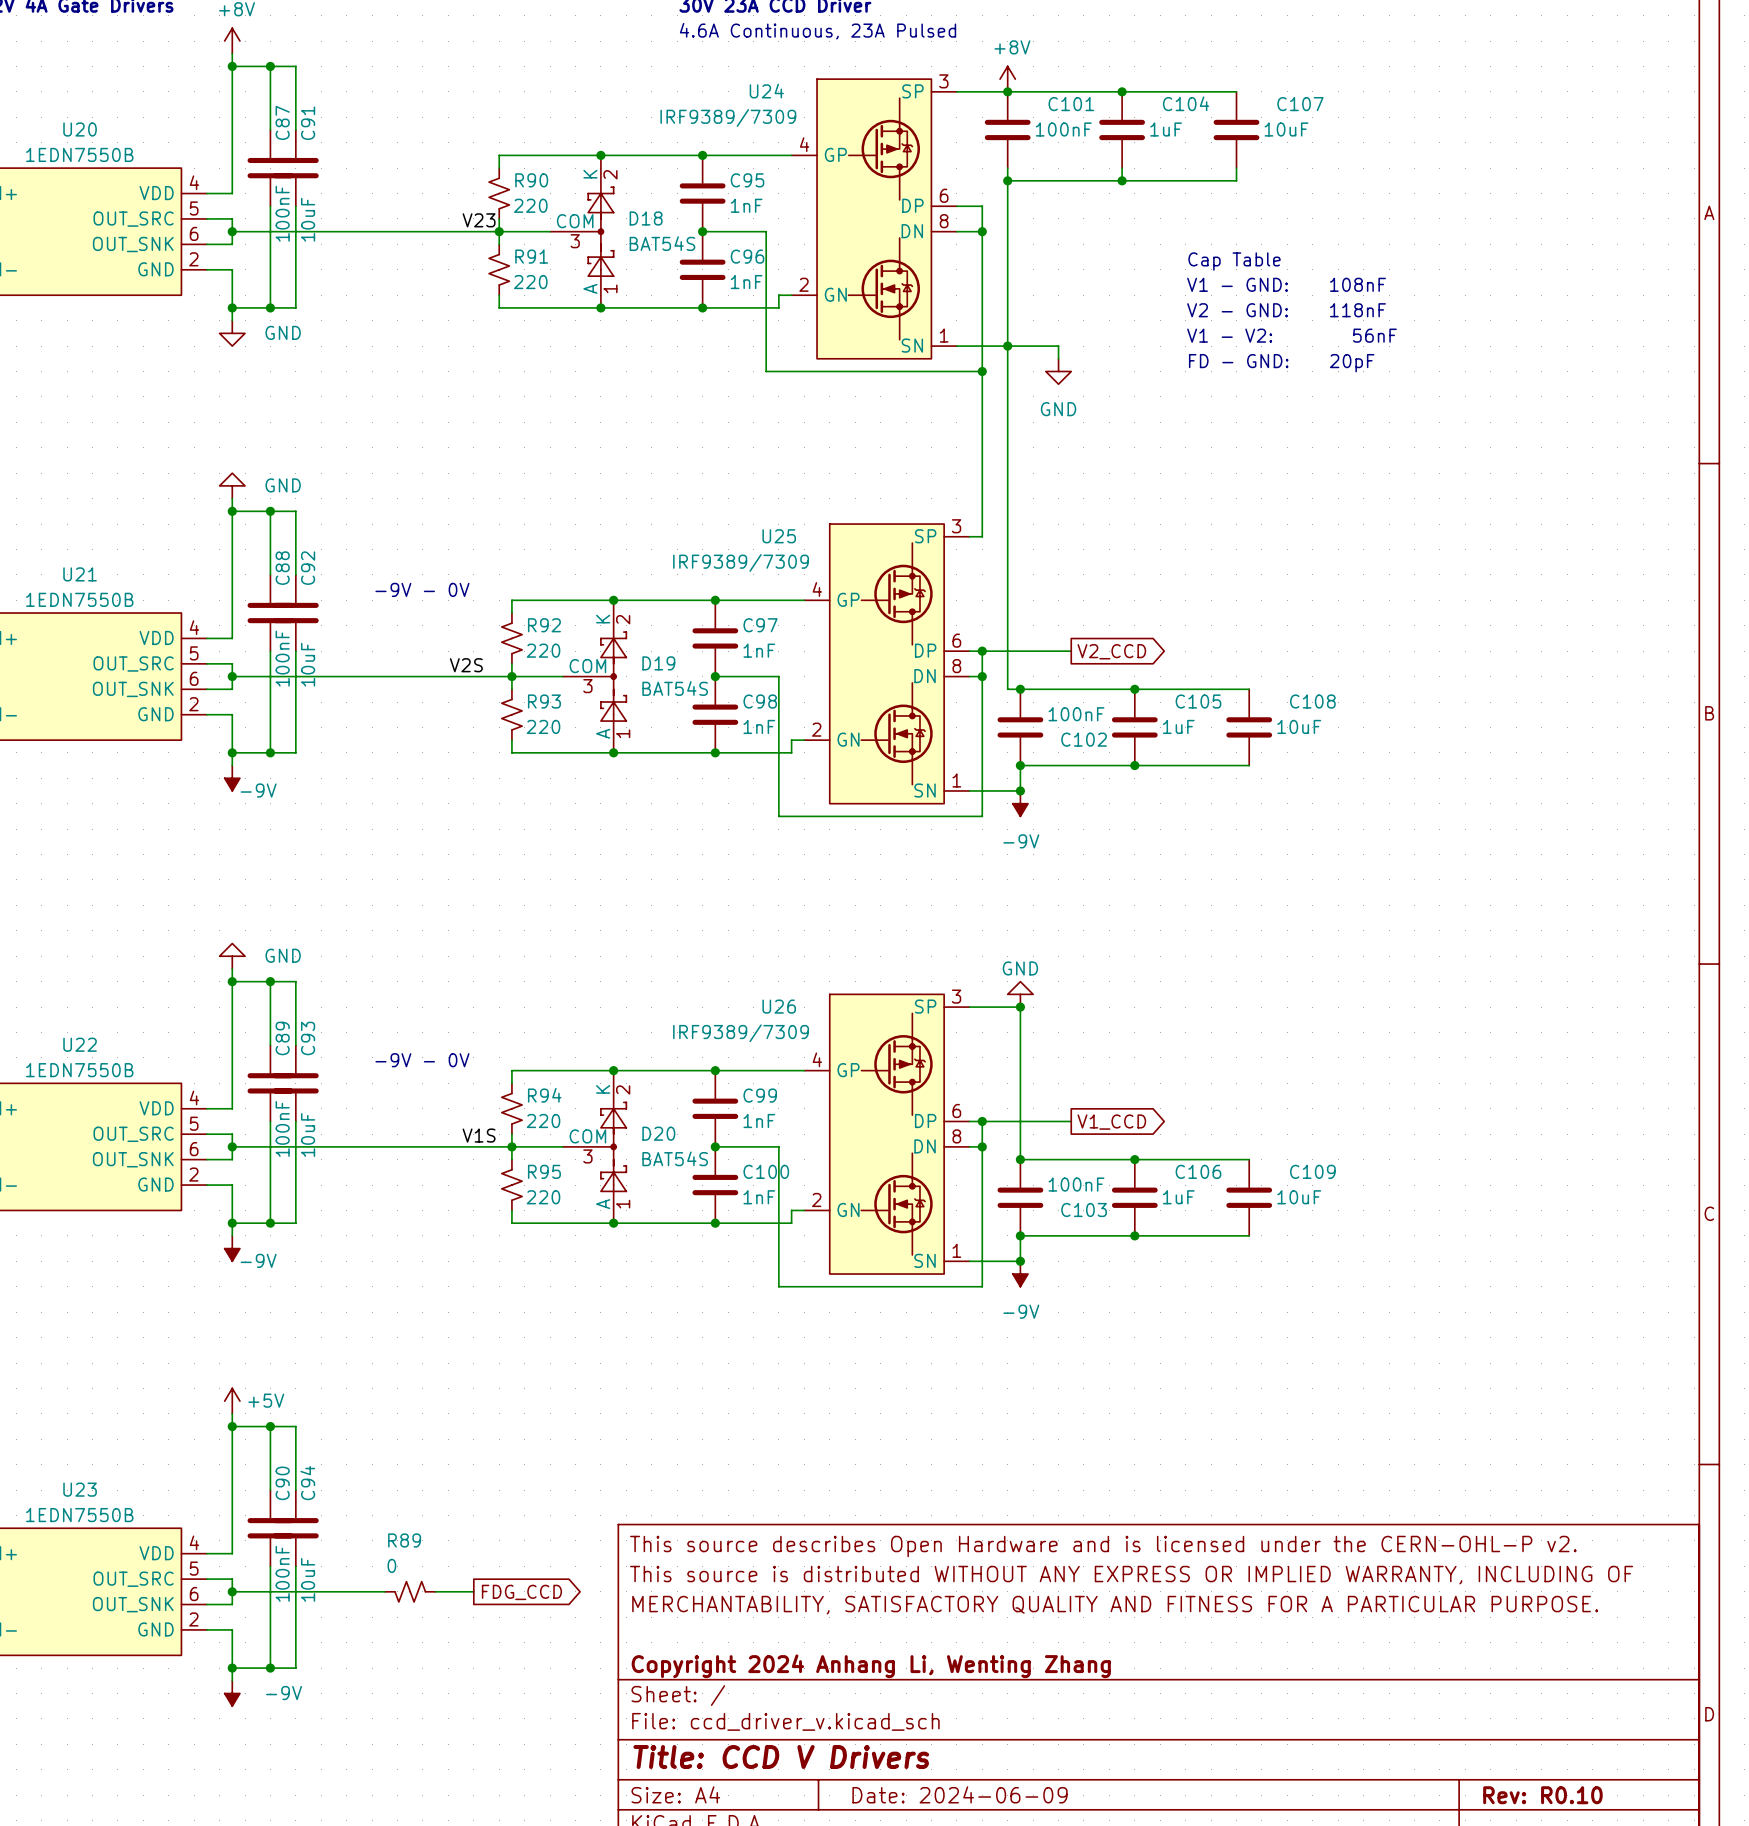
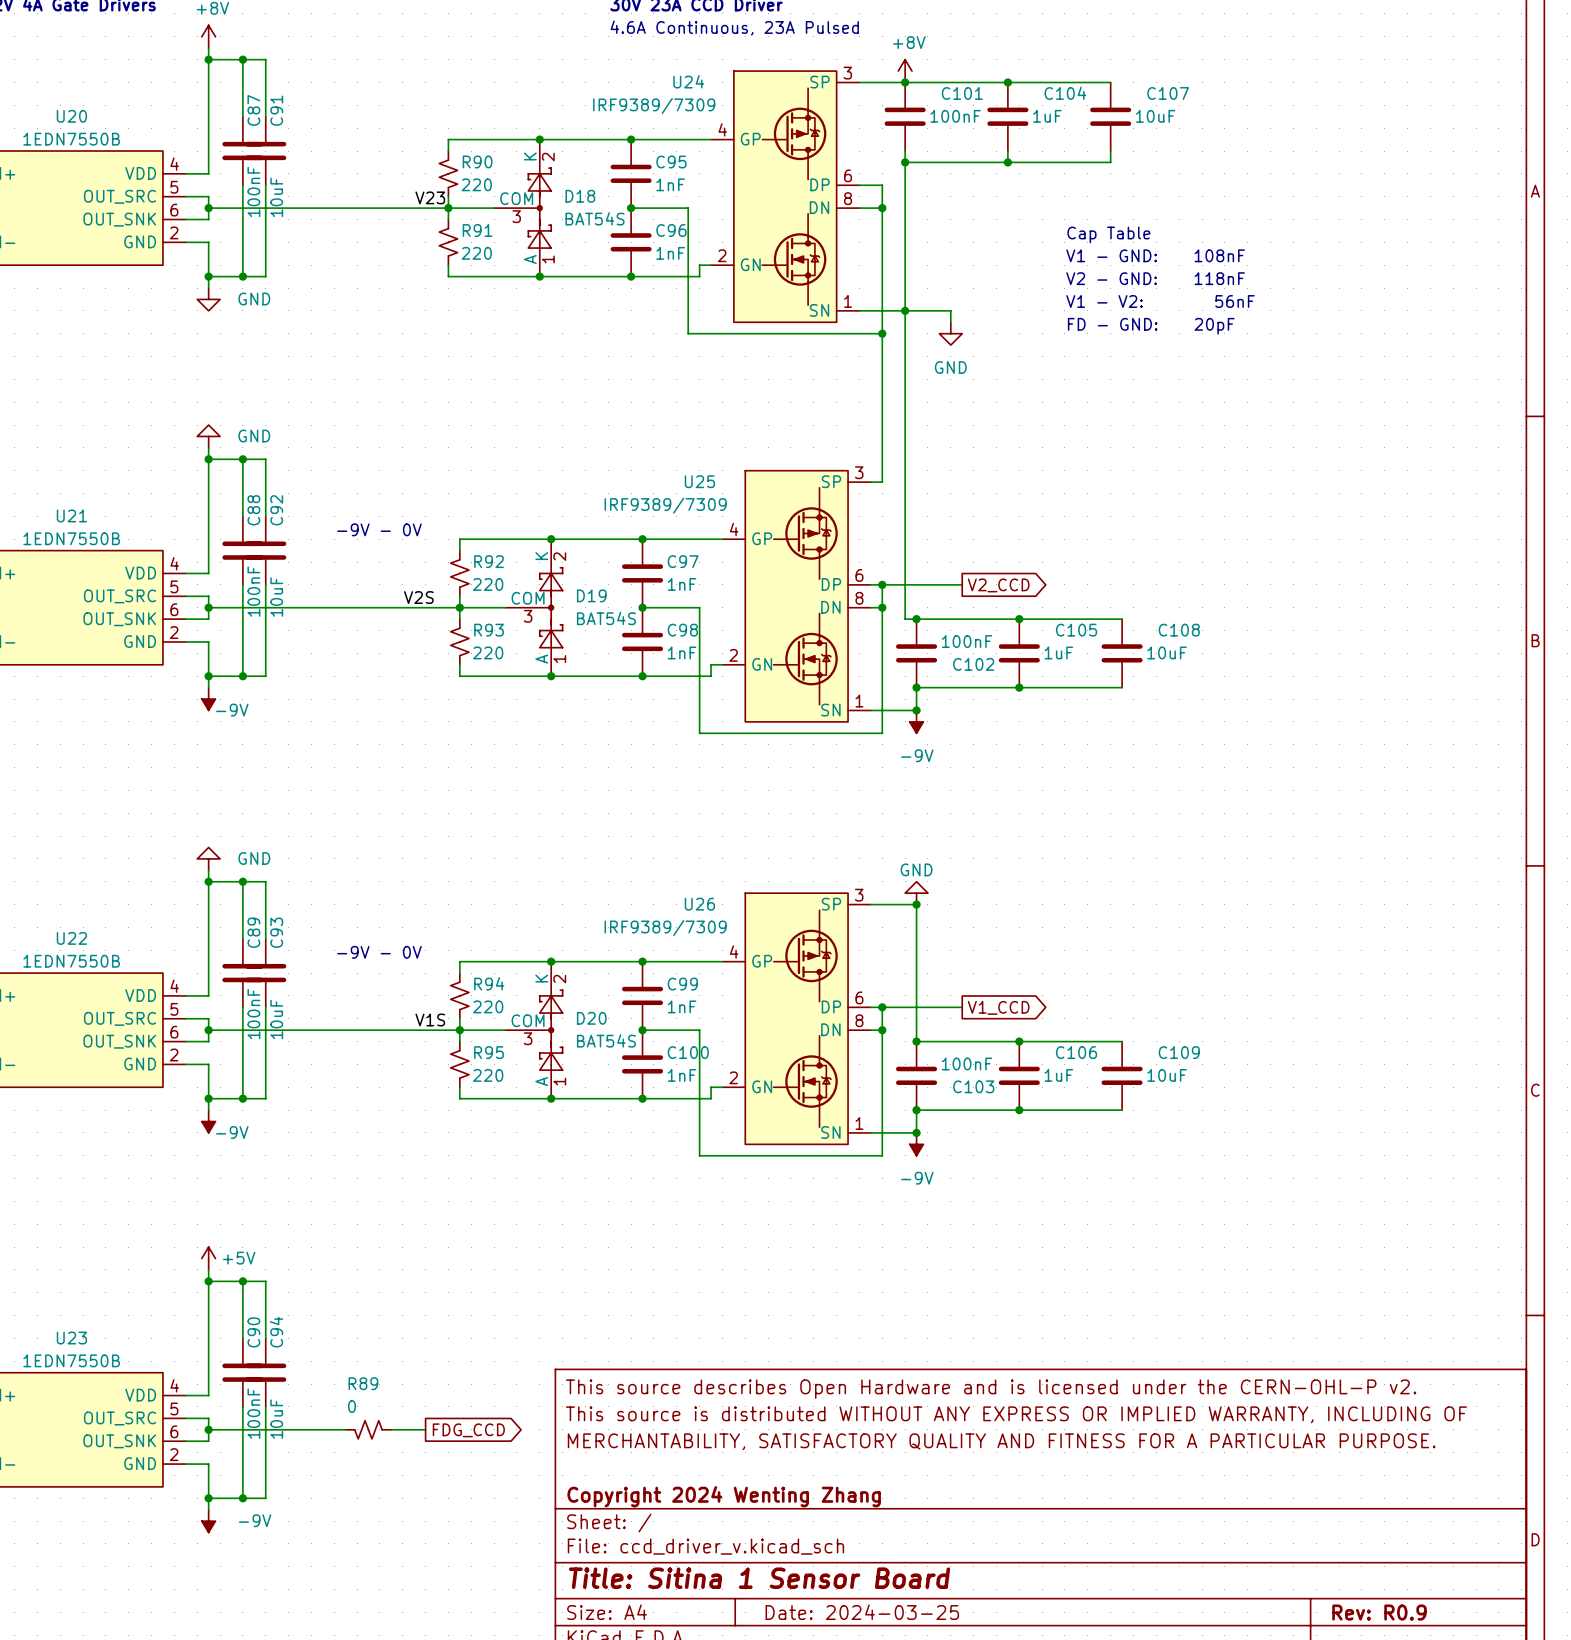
title block: Copyright 2024 Anhang Li, Wenting Zhang (871, 1666) -> Copyright 2024 Wenting Zhang (724, 1496)
title block: Title: CCD V Drivers (781, 1757) -> Title: Sitina 1 Sensor Board (759, 1578)
title block: Date: 2024-06-09 (960, 1794) -> Date: 2024-03-25 (862, 1612)
title block: Rev: R0.10 (1542, 1795) -> Rev: R0.9 (1379, 1612)

